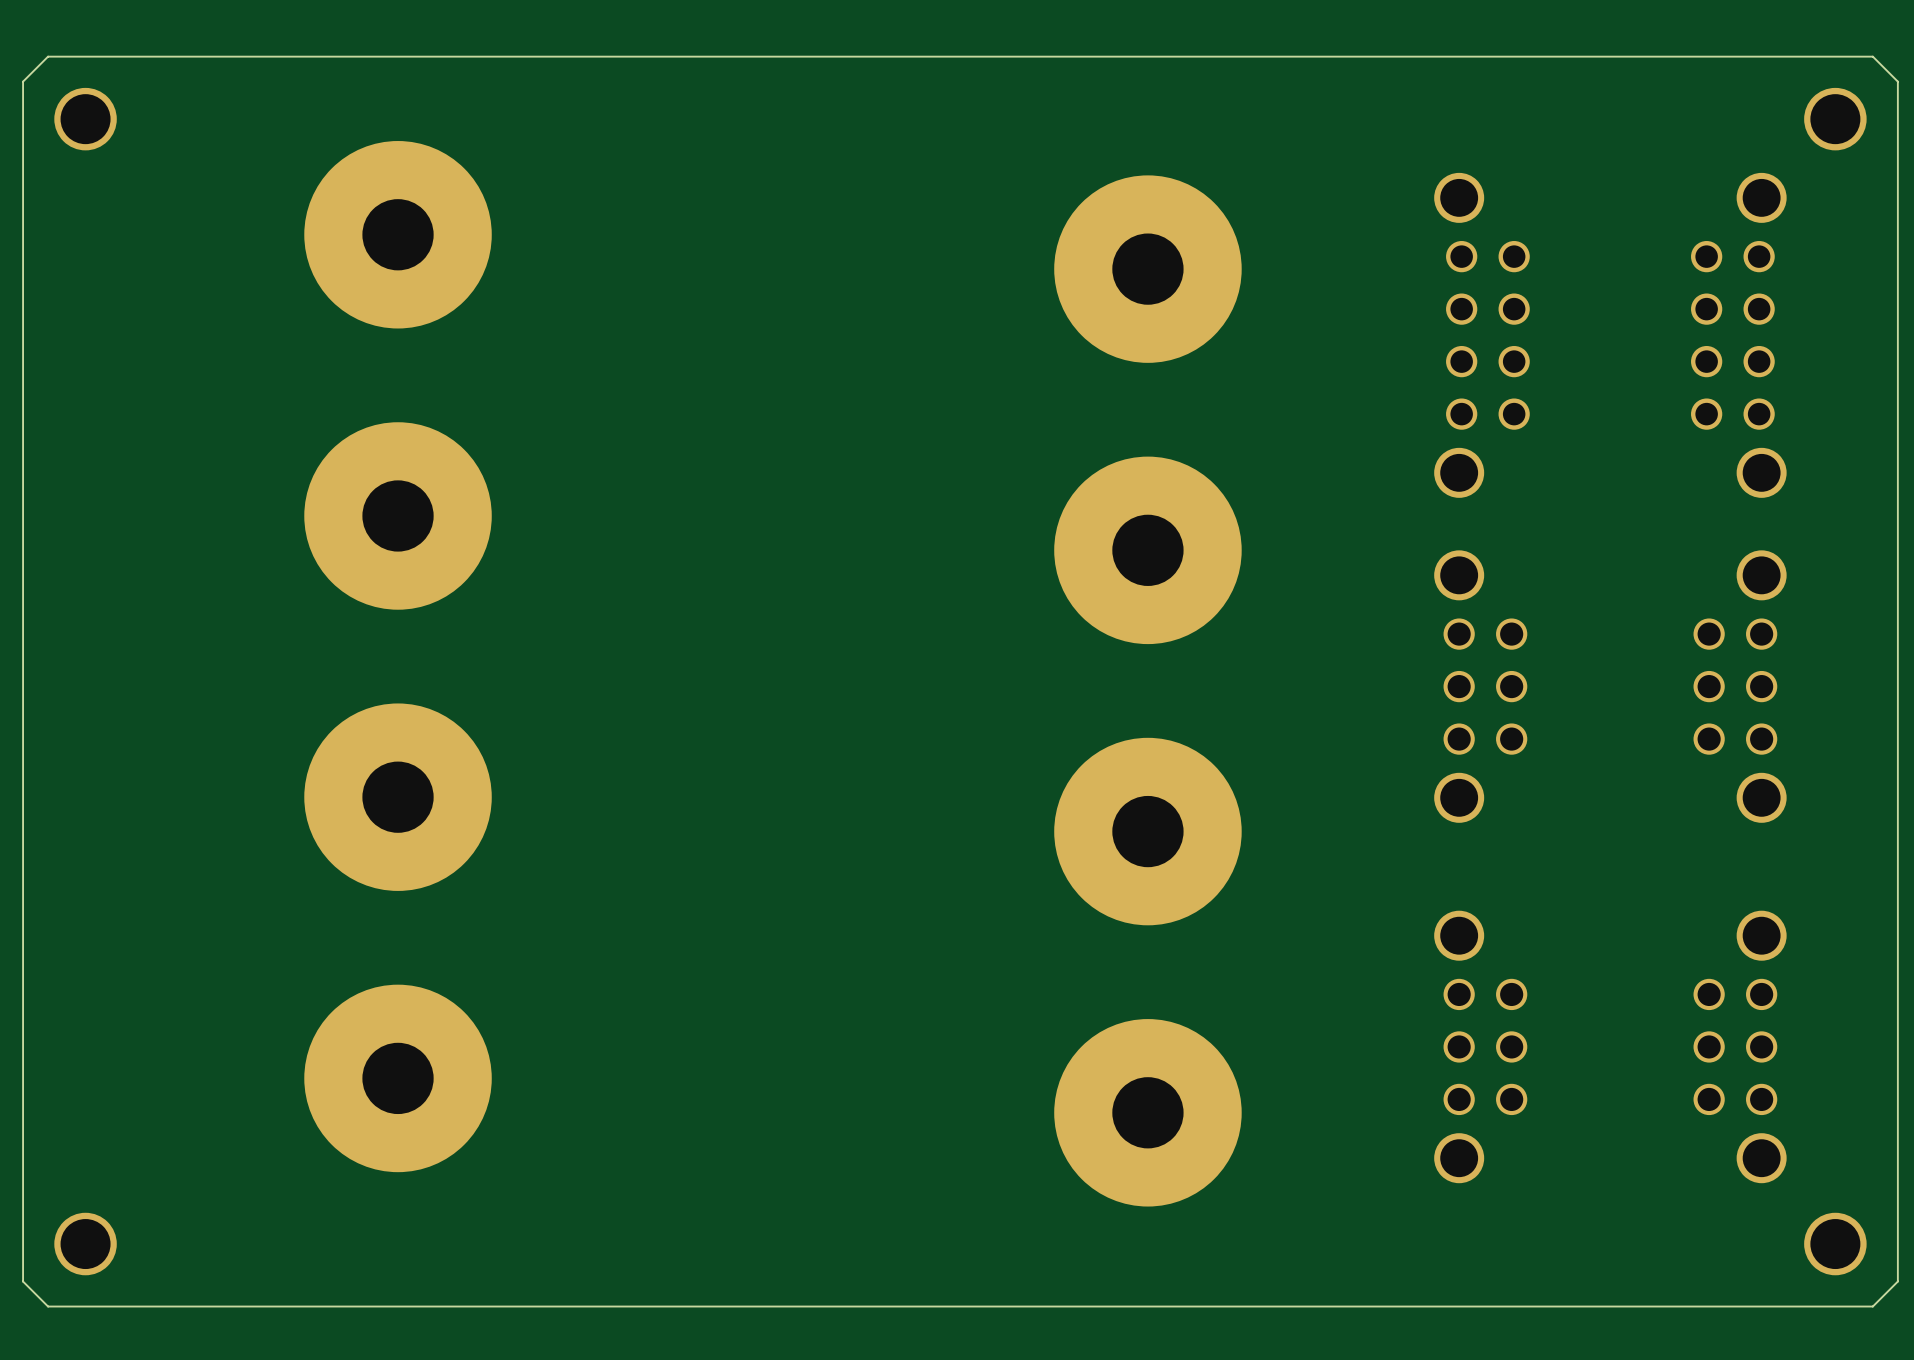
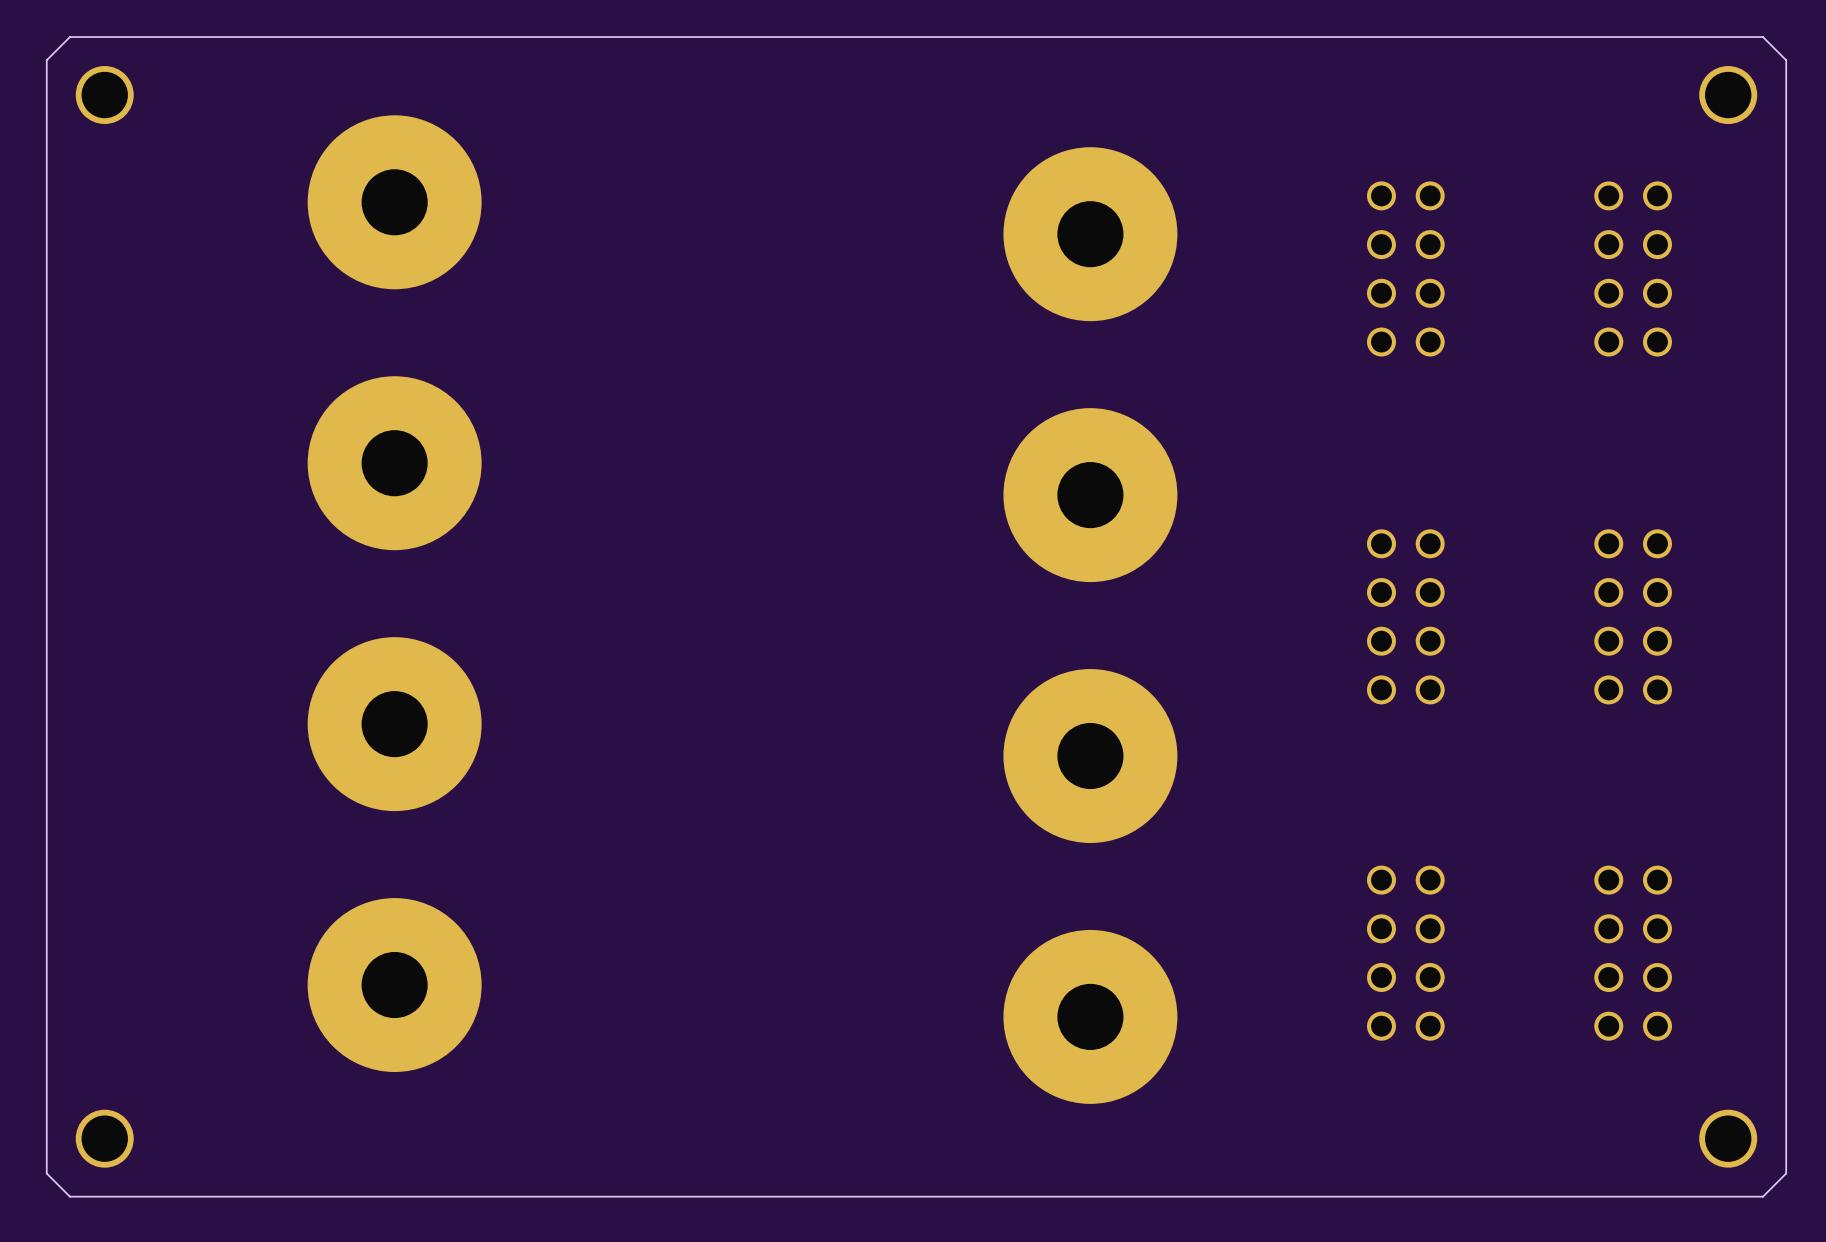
part: none -> (1405, 268)
part: none -> (1633, 268)
part: (1481, 335) -> none
part: (1738, 335) -> none
part footprint: [1434, 550, 1528, 823] -> [1366, 529, 1445, 705]
part footprint: [1693, 550, 1787, 823] -> [1594, 529, 1672, 705]
part footprint: [1434, 910, 1528, 1184] -> [1366, 865, 1445, 1041]
part footprint: [1693, 910, 1787, 1184] -> [1594, 865, 1672, 1041]

